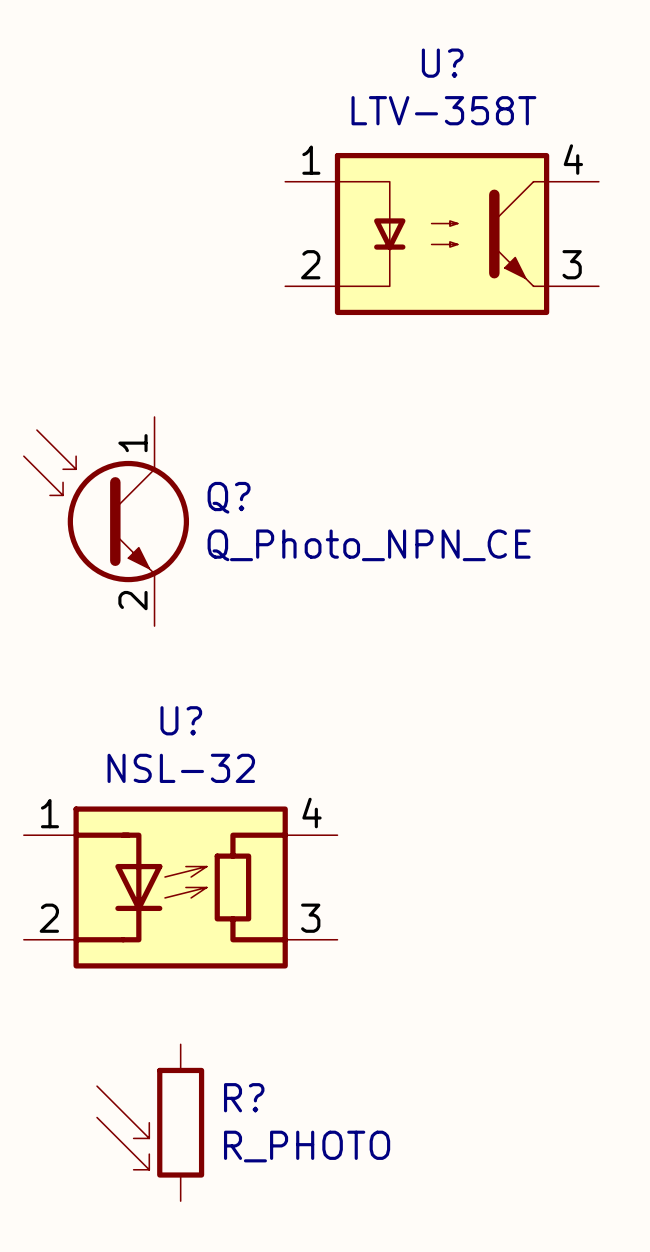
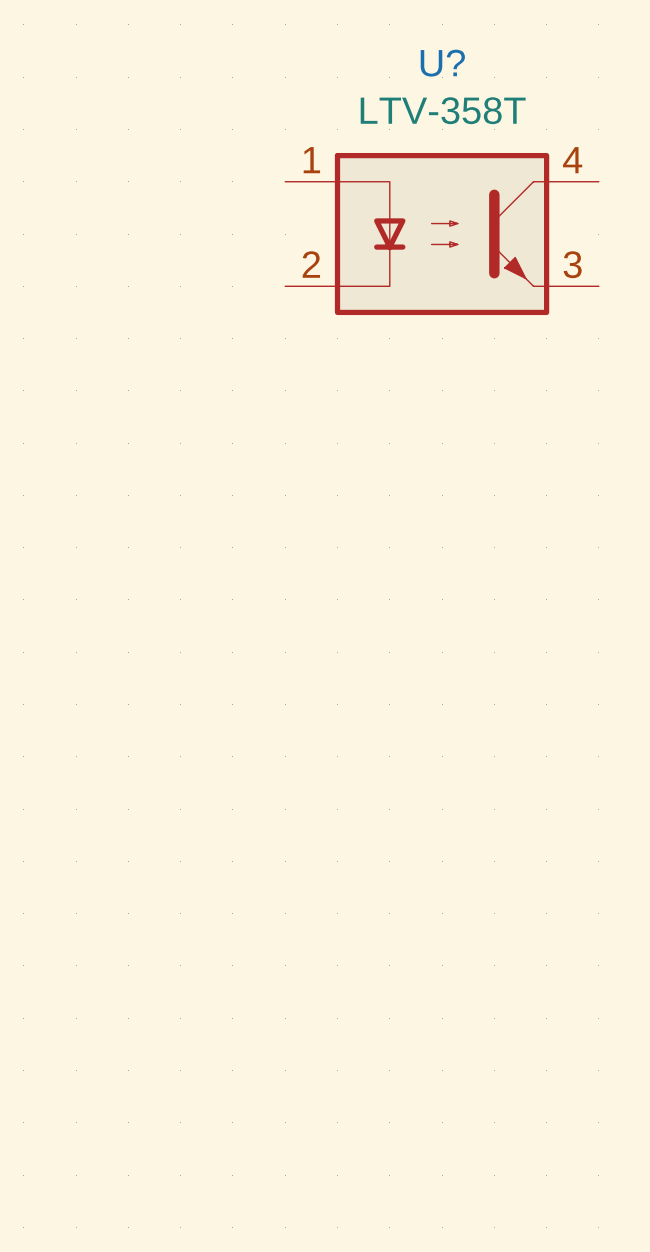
Q?: Q_Photo_NPN_CE (106, 521) -> none
U?: NSL-32 (180, 887) -> none
R?: R_PHOTO (150, 1122) -> none

